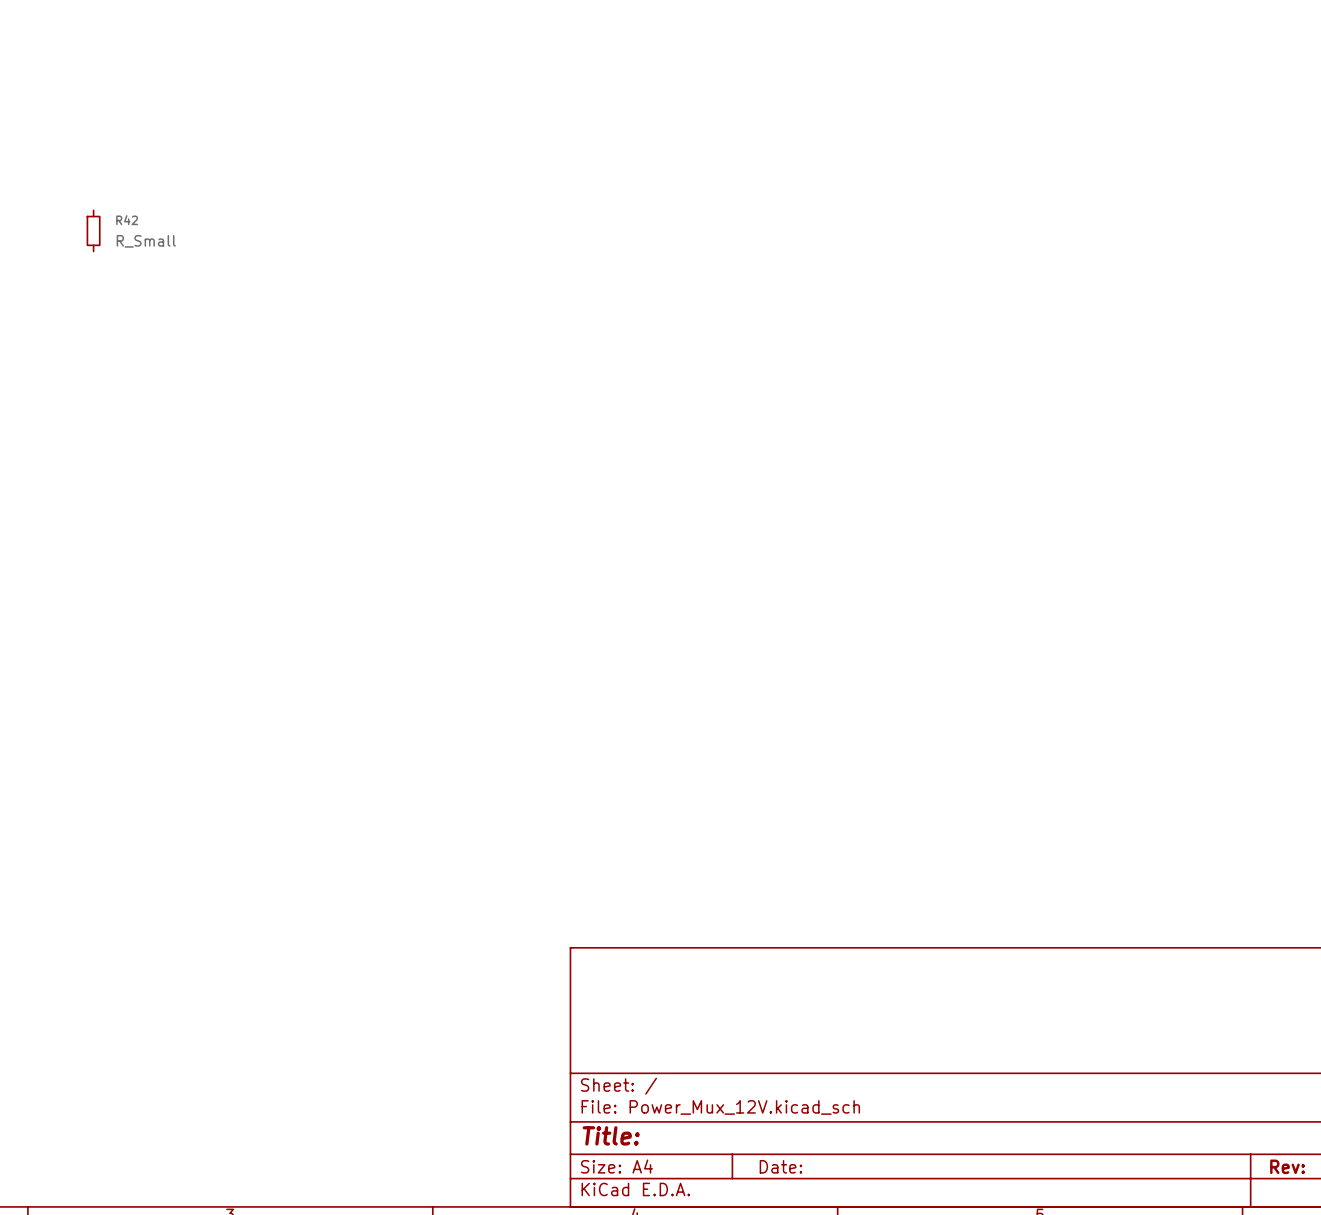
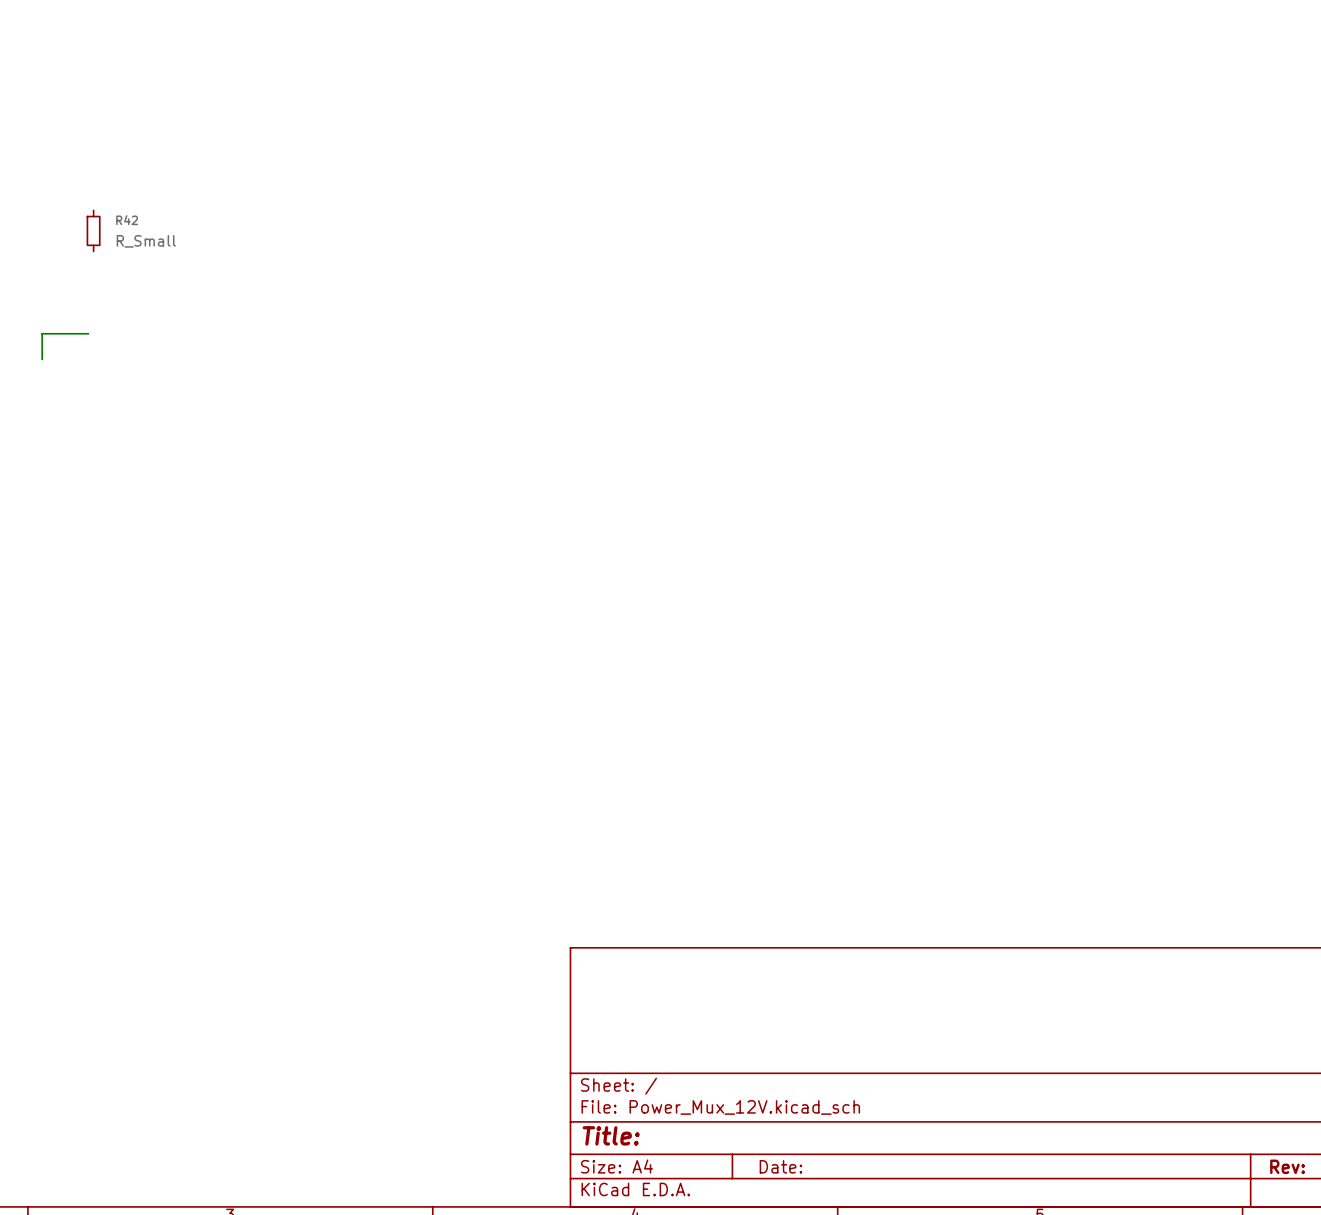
wire: none -> (88, 333) (42, 333) (42, 359)

